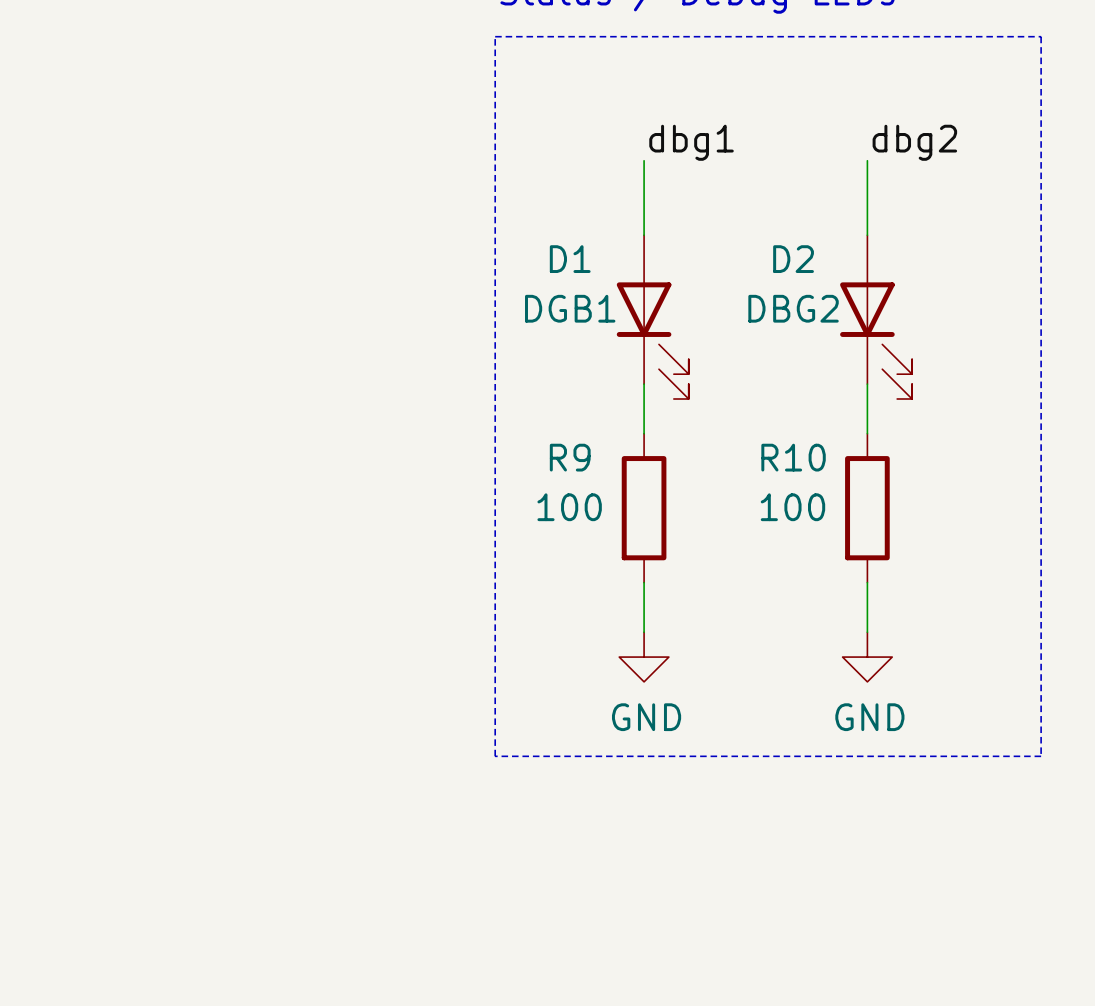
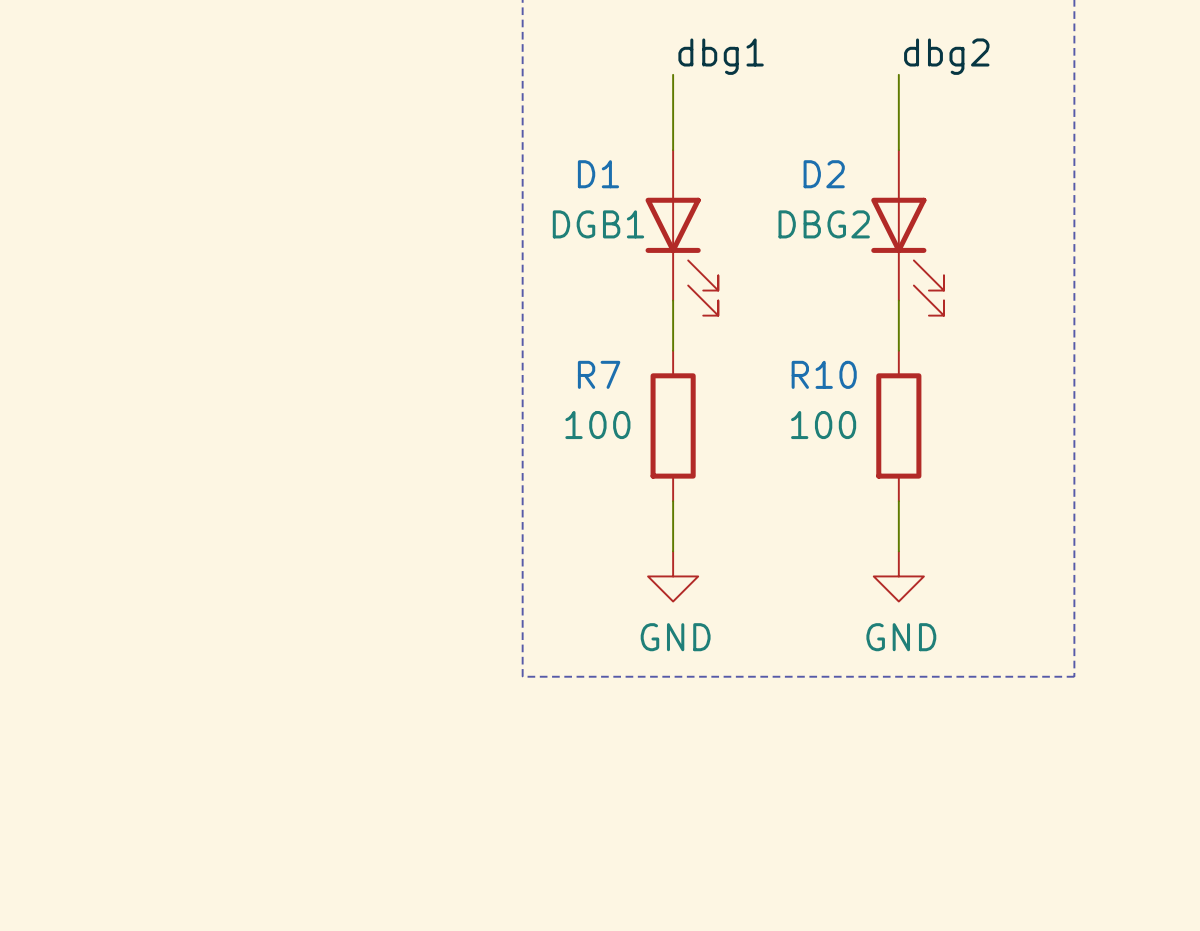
R9 name: R9 (570, 457) -> R7 (599, 374)

